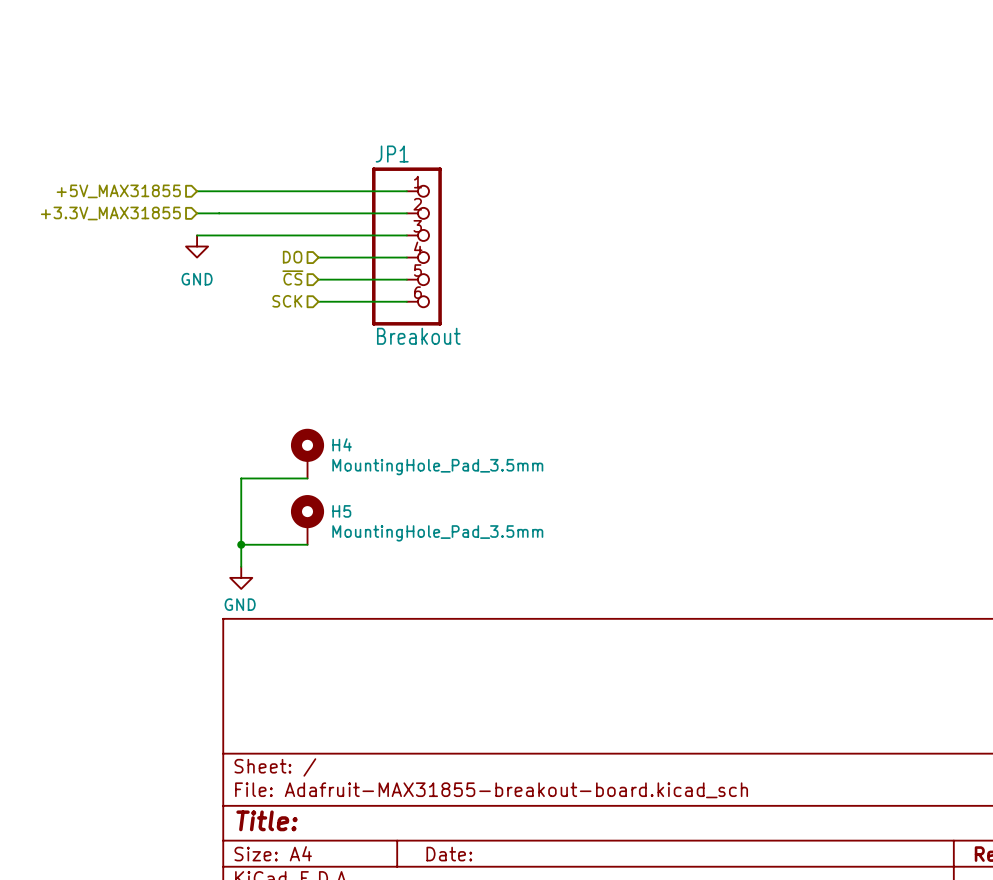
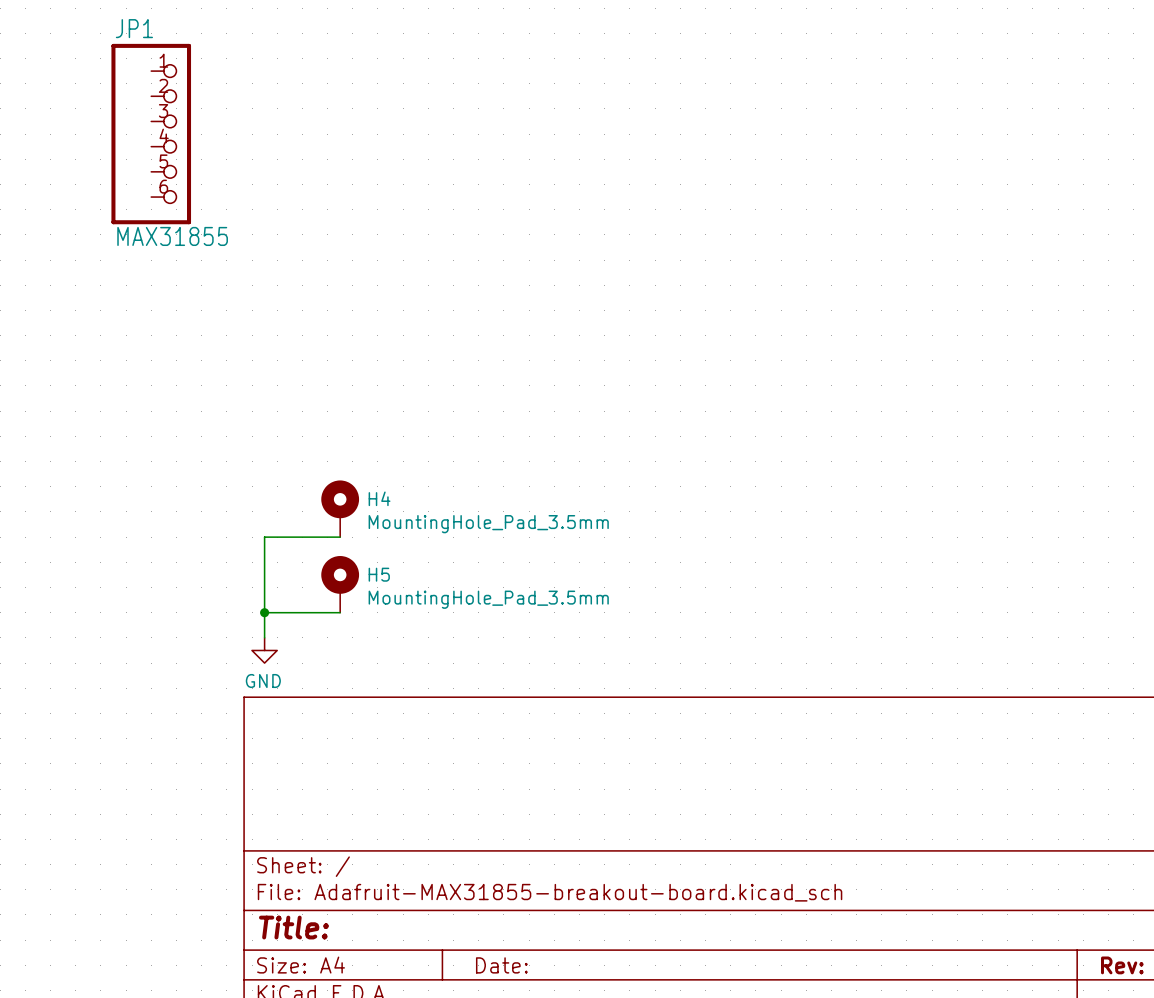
hierarchical label: +5V_MAX31855 (118, 191) -> none
wire: (197, 191) (406, 191) -> none
hierarchical label: +3.3V_MAX31855 (110, 213) -> none
wire: (197, 213) (406, 213) -> none
wire: (197, 235) (406, 235) -> none
power symbol: GND (197, 246) -> none
JP1 position: (406, 246) -> (151, 134)
hierarchical label: DO (292, 257) -> none
wire: (318, 257) (406, 257) -> none
hierarchical label: ~{CS} (292, 277) -> none
wire: (318, 279) (406, 279) -> none
hierarchical label: SCK (287, 301) -> none
wire: (318, 301) (406, 301) -> none
JP1 value: Breakout (418, 336) -> MAX31855 (172, 236)

